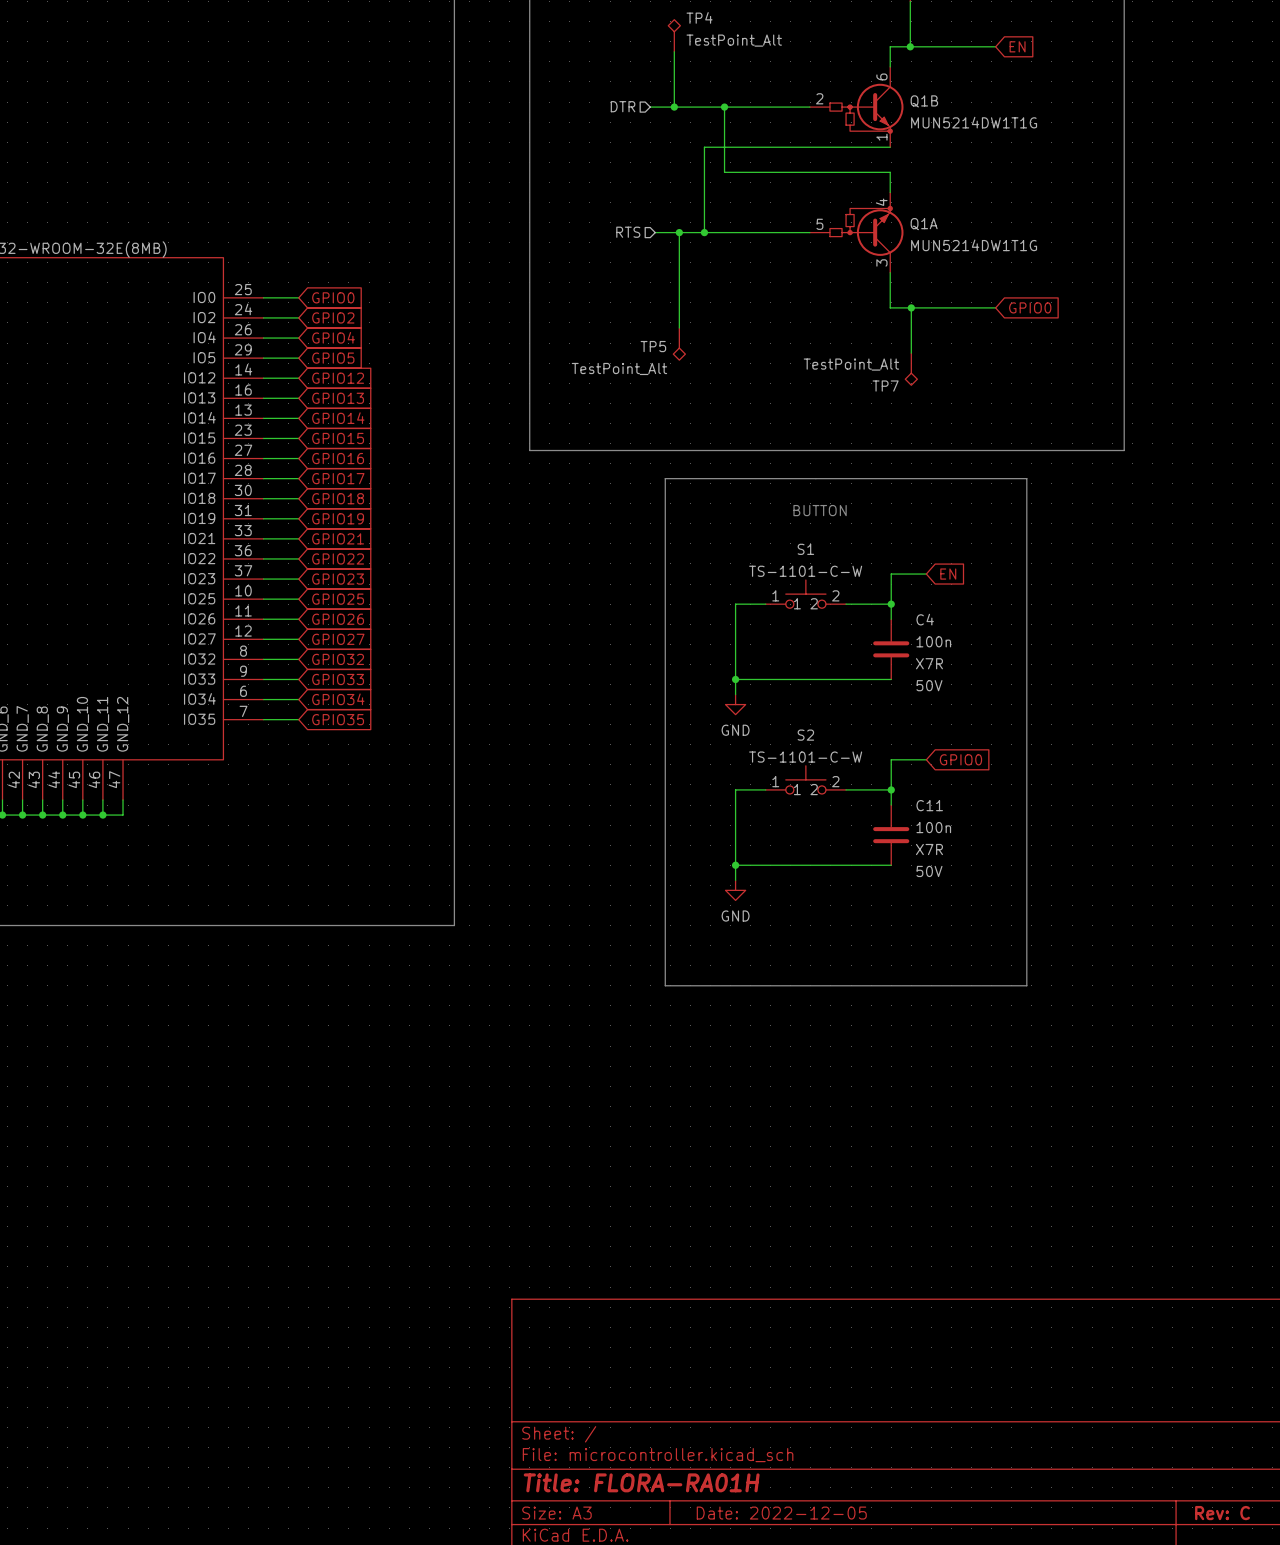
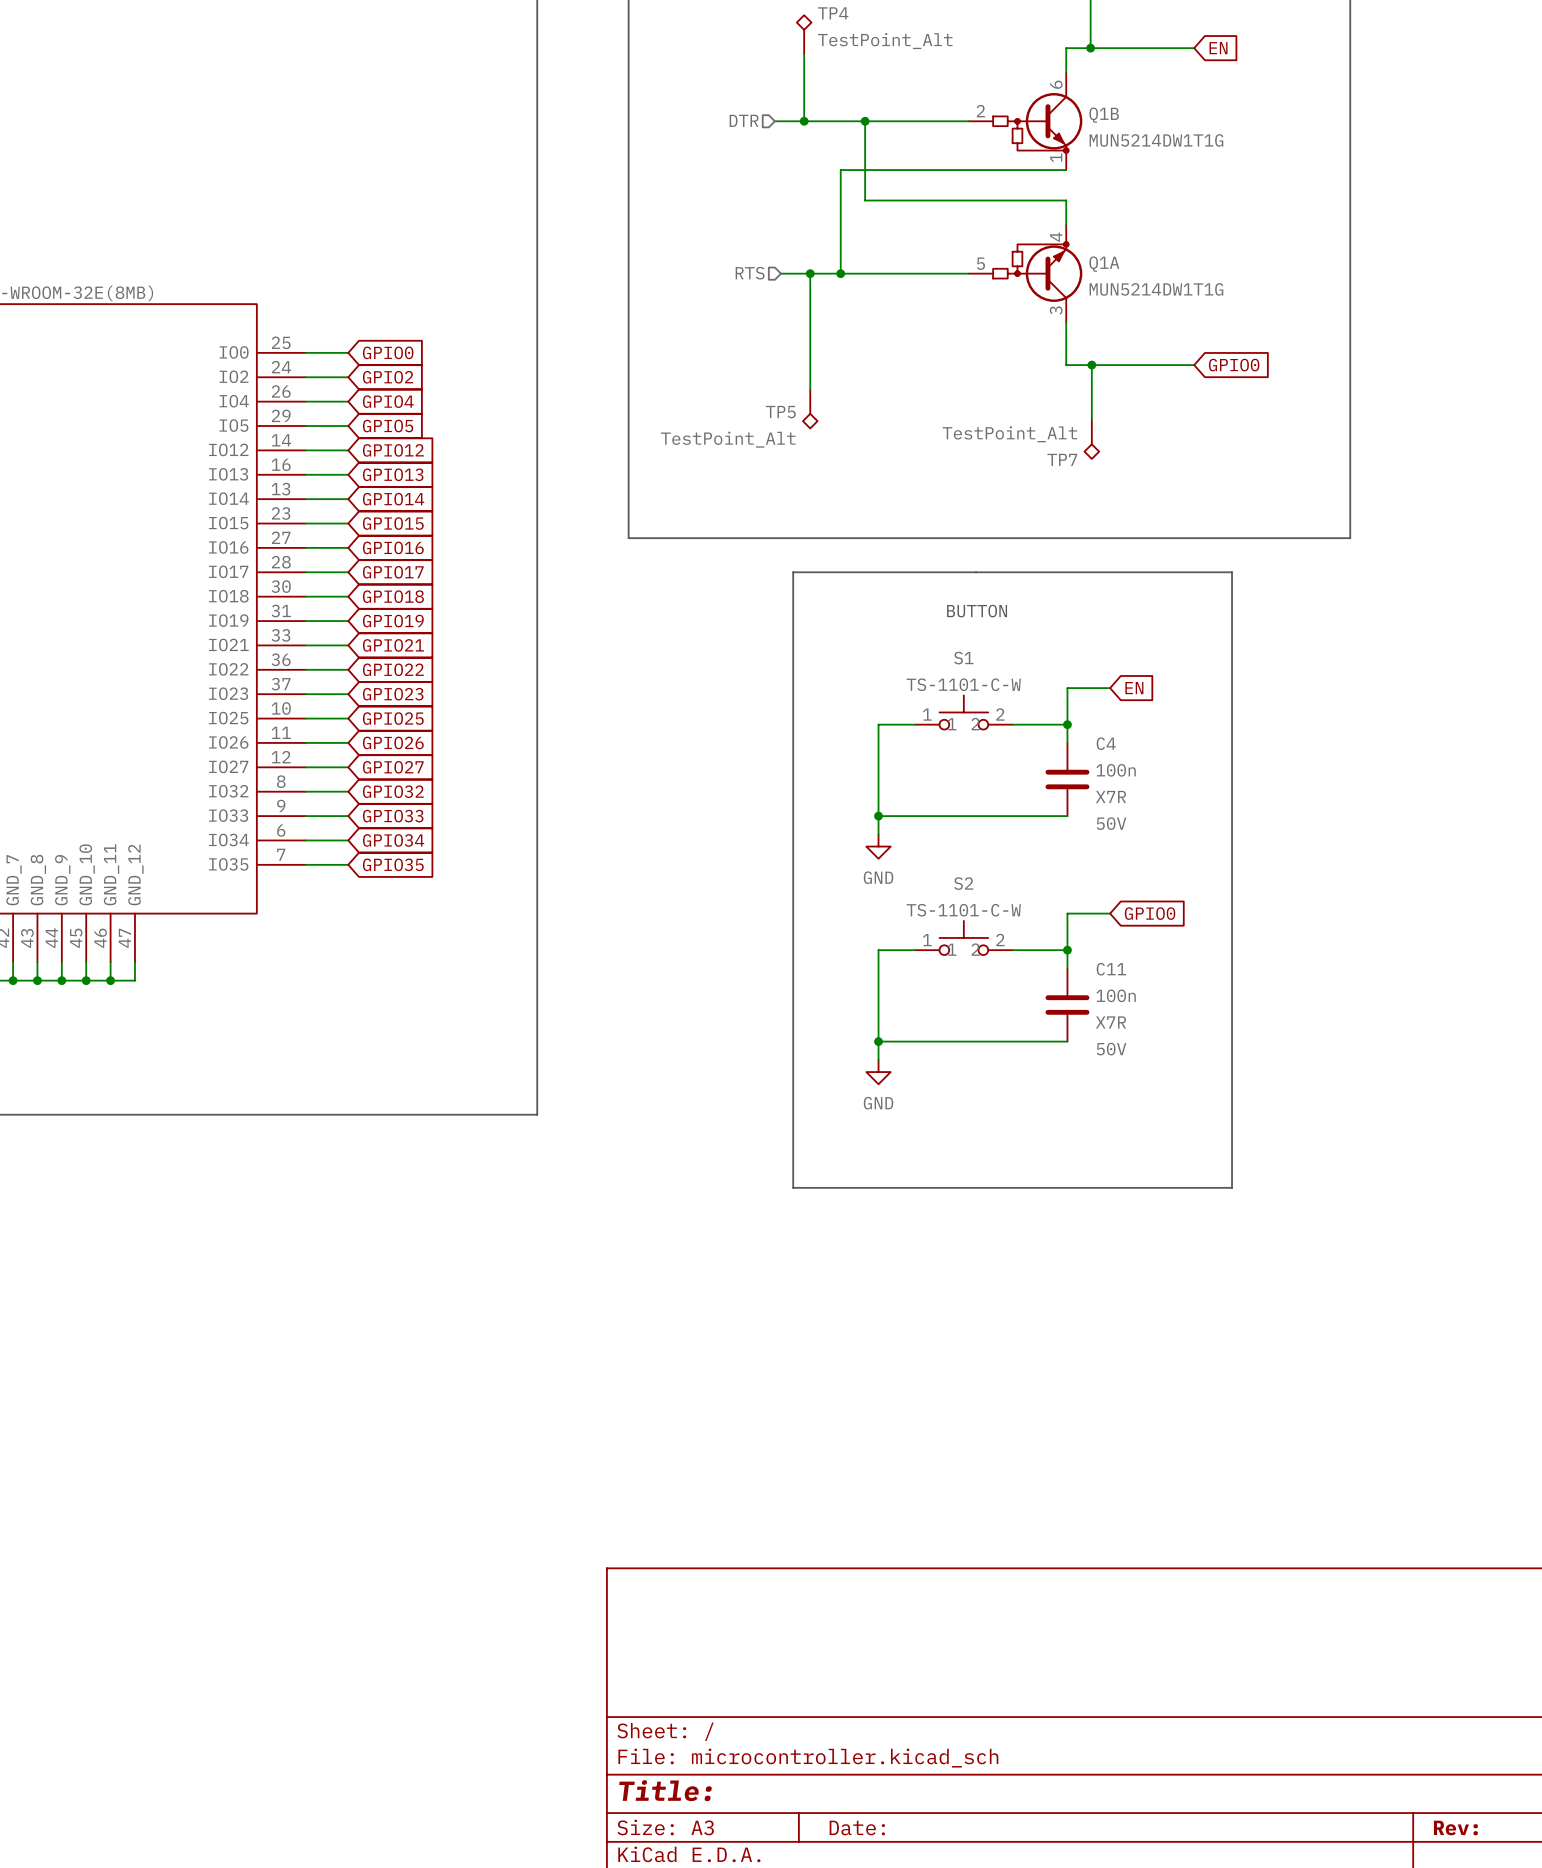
title block: Title: FLORA-RA01H (641, 1482) -> Title: (665, 1790)
title block: Date: 2022-12-05 (781, 1513) -> Date: (857, 1828)
title block: Rev: C (1222, 1513) -> Rev: (1455, 1828)

